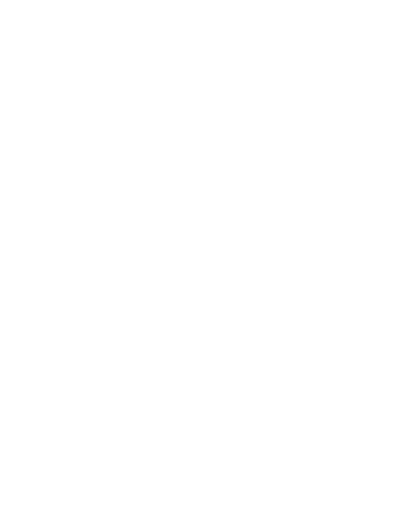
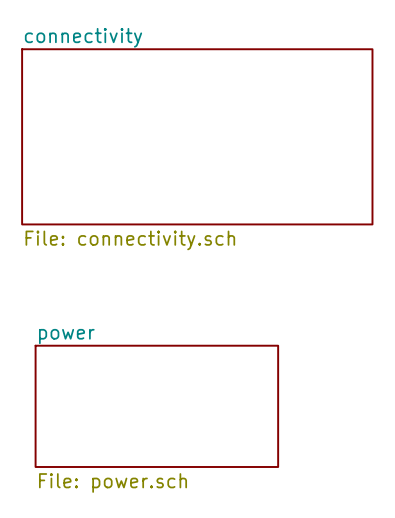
sheet connectivity: none -> File: connectivity.sch (197, 136)
sheet power: none -> File: power.sch (156, 406)

